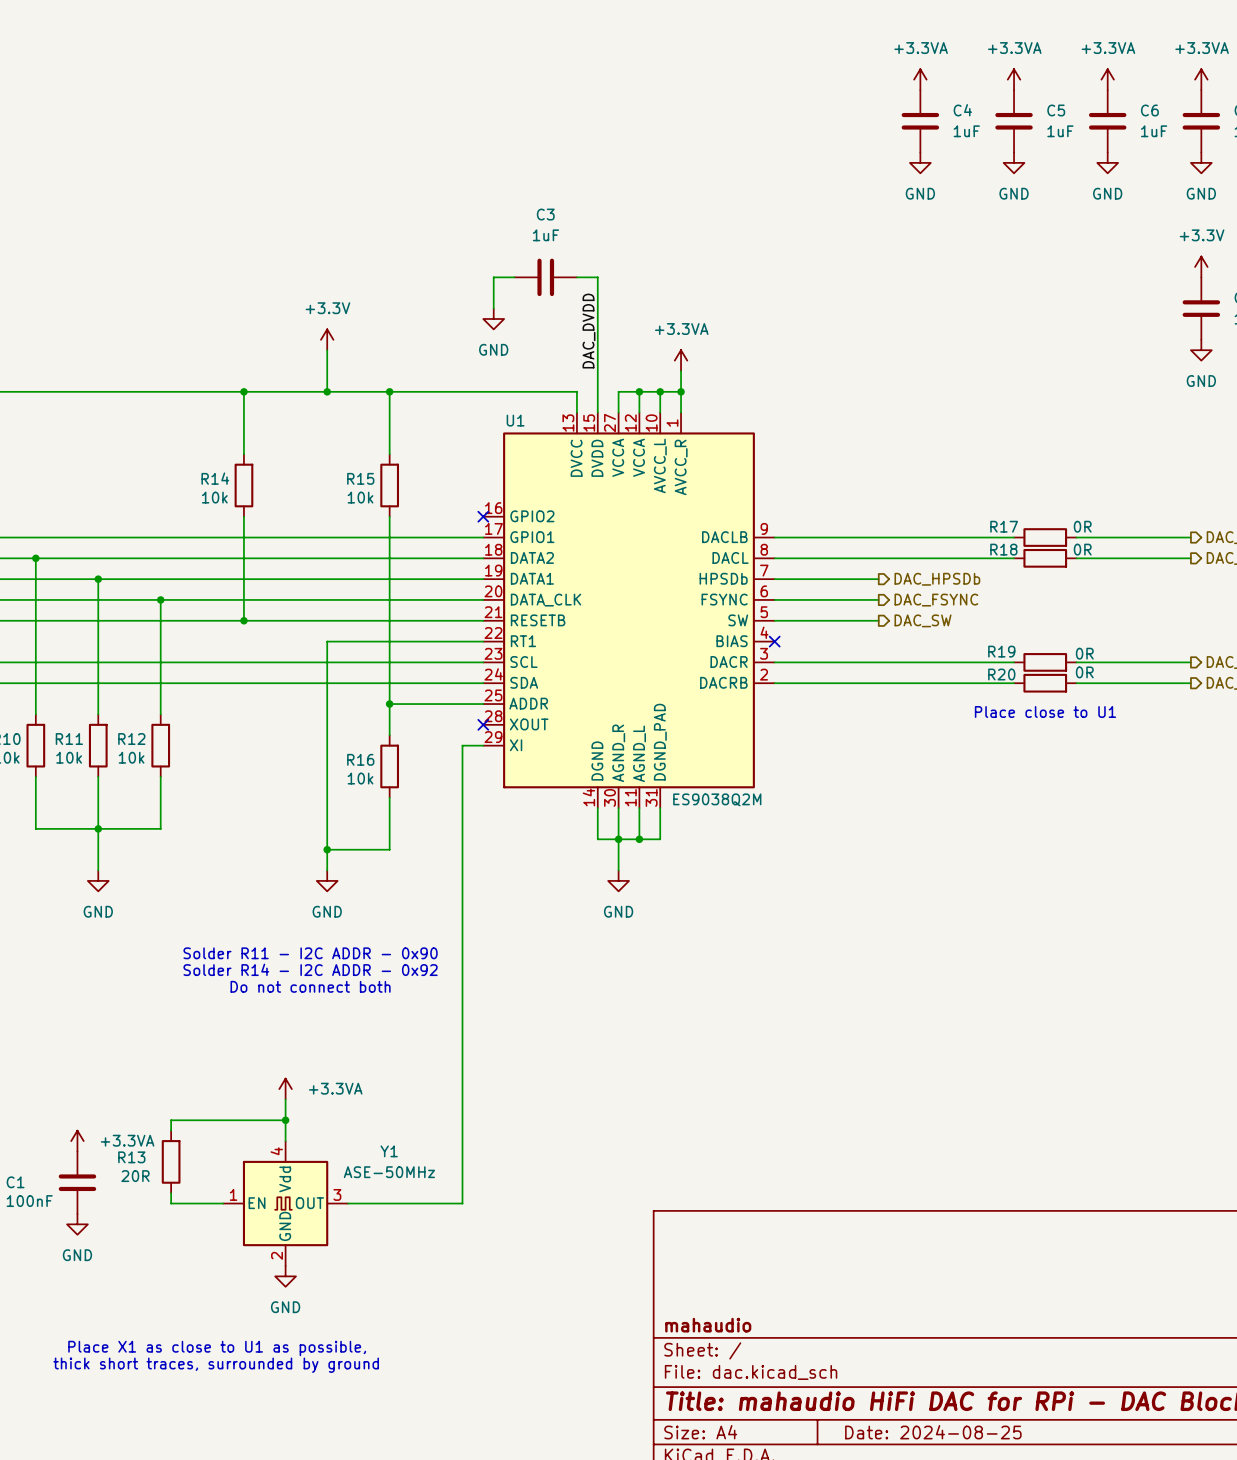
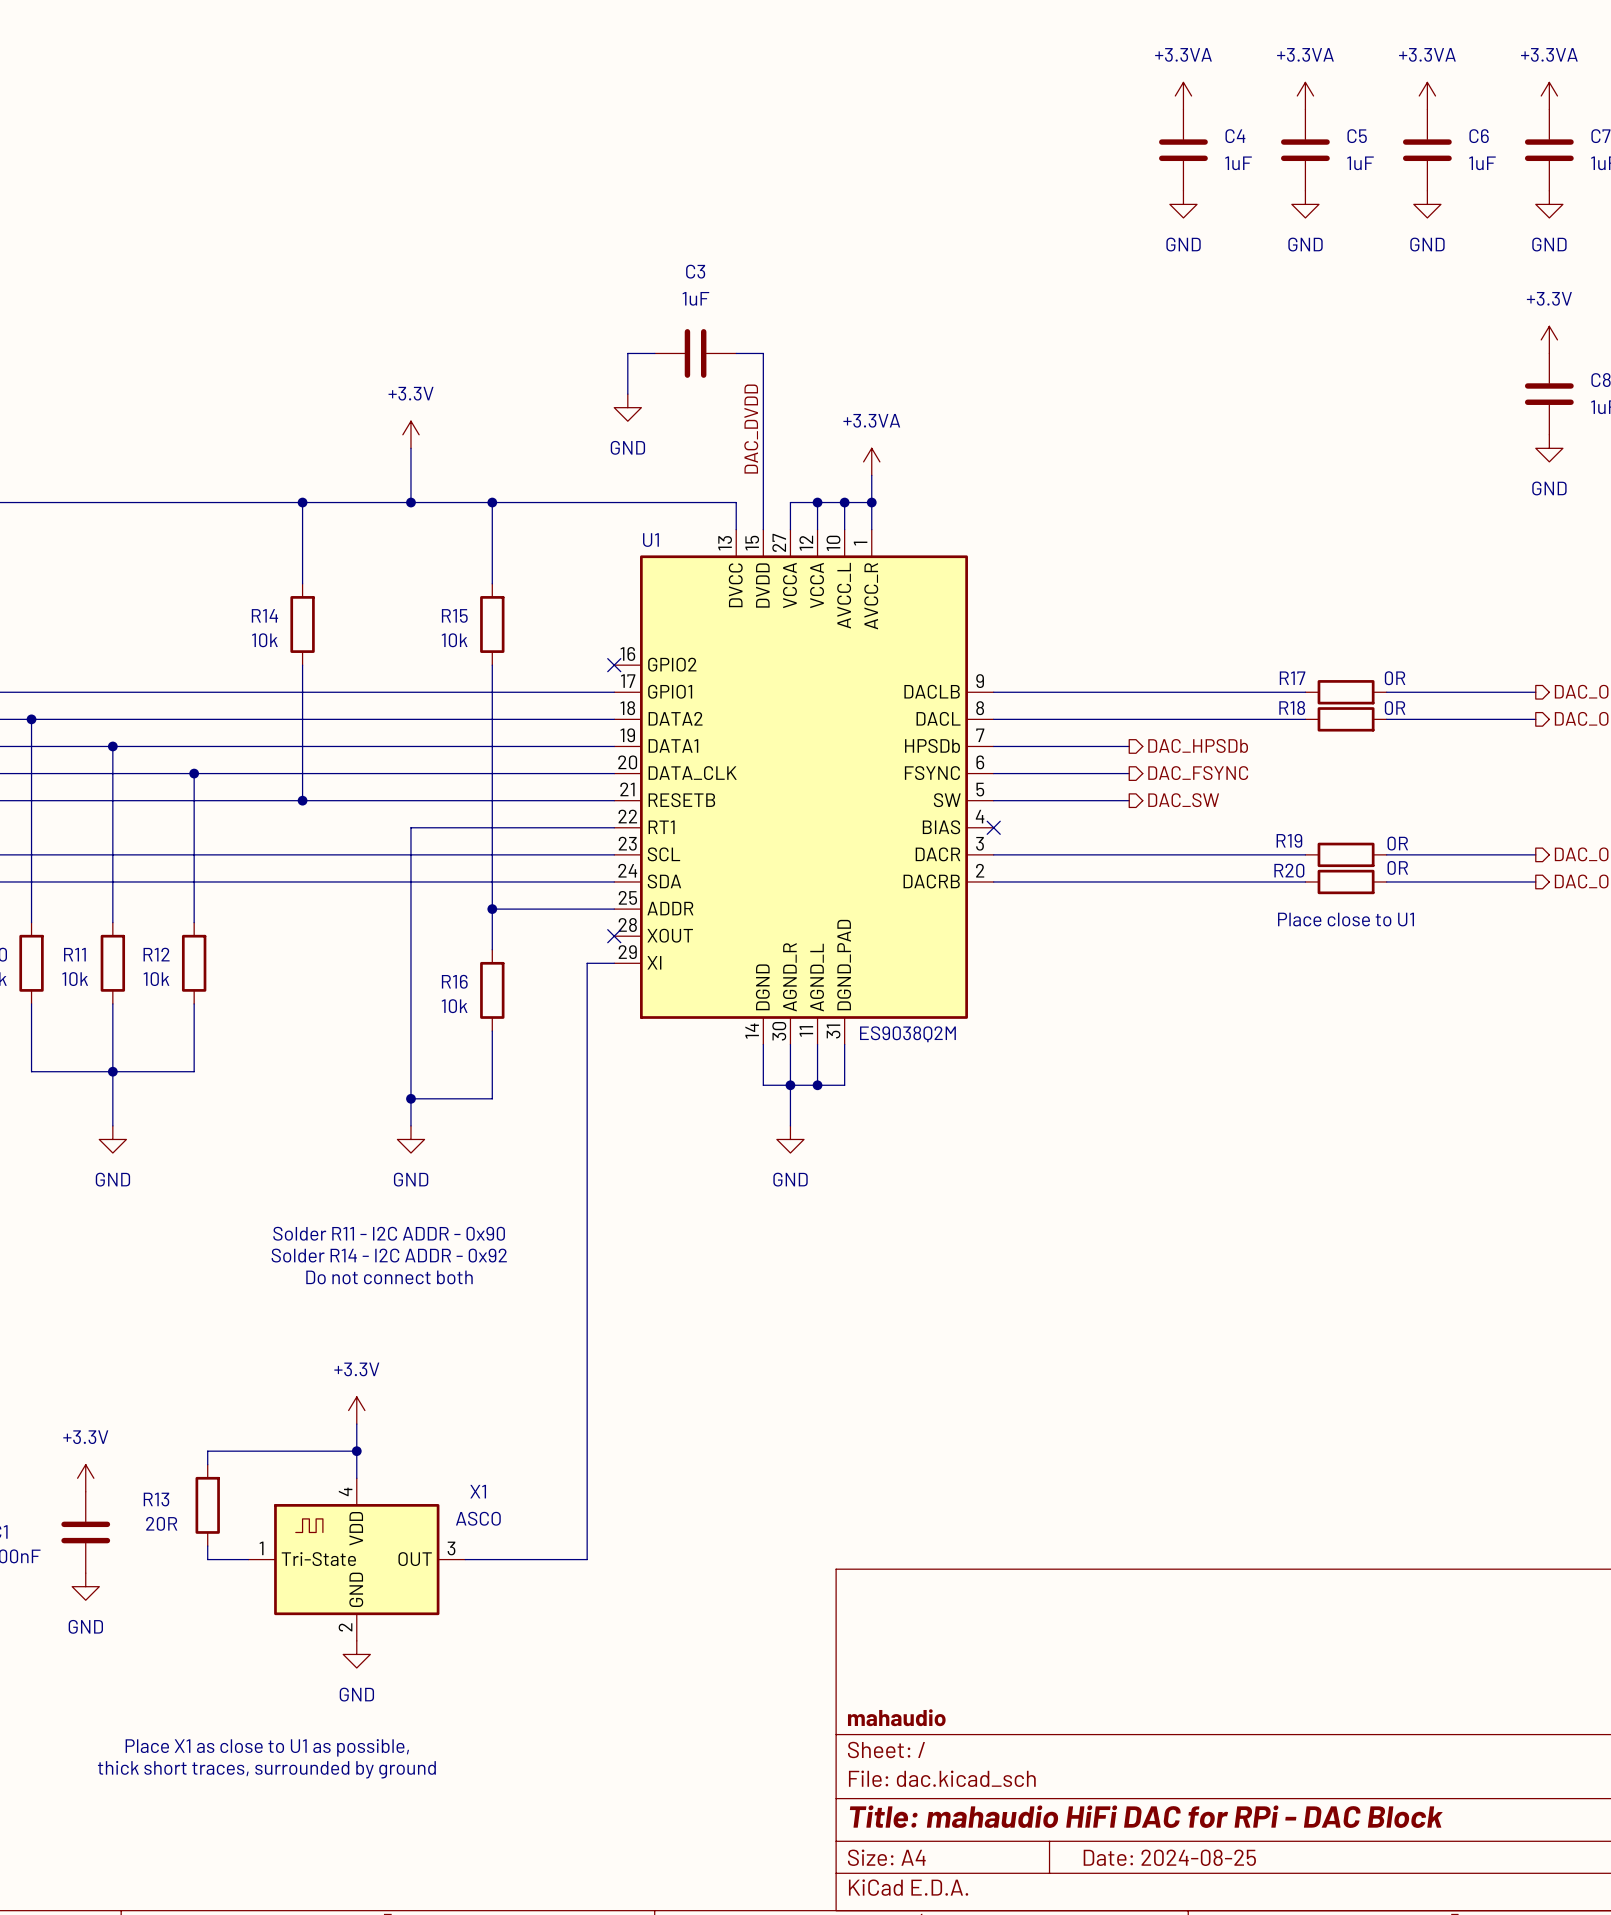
power symbol: +3.3VA (285, 1089) -> +3.3V (356, 1410)
power symbol: +3.3VA (77, 1141) -> +3.3V (85, 1478)
Y1: ASE-50MHz (285, 1203) -> none
X1: none -> ASCO (356, 1559)

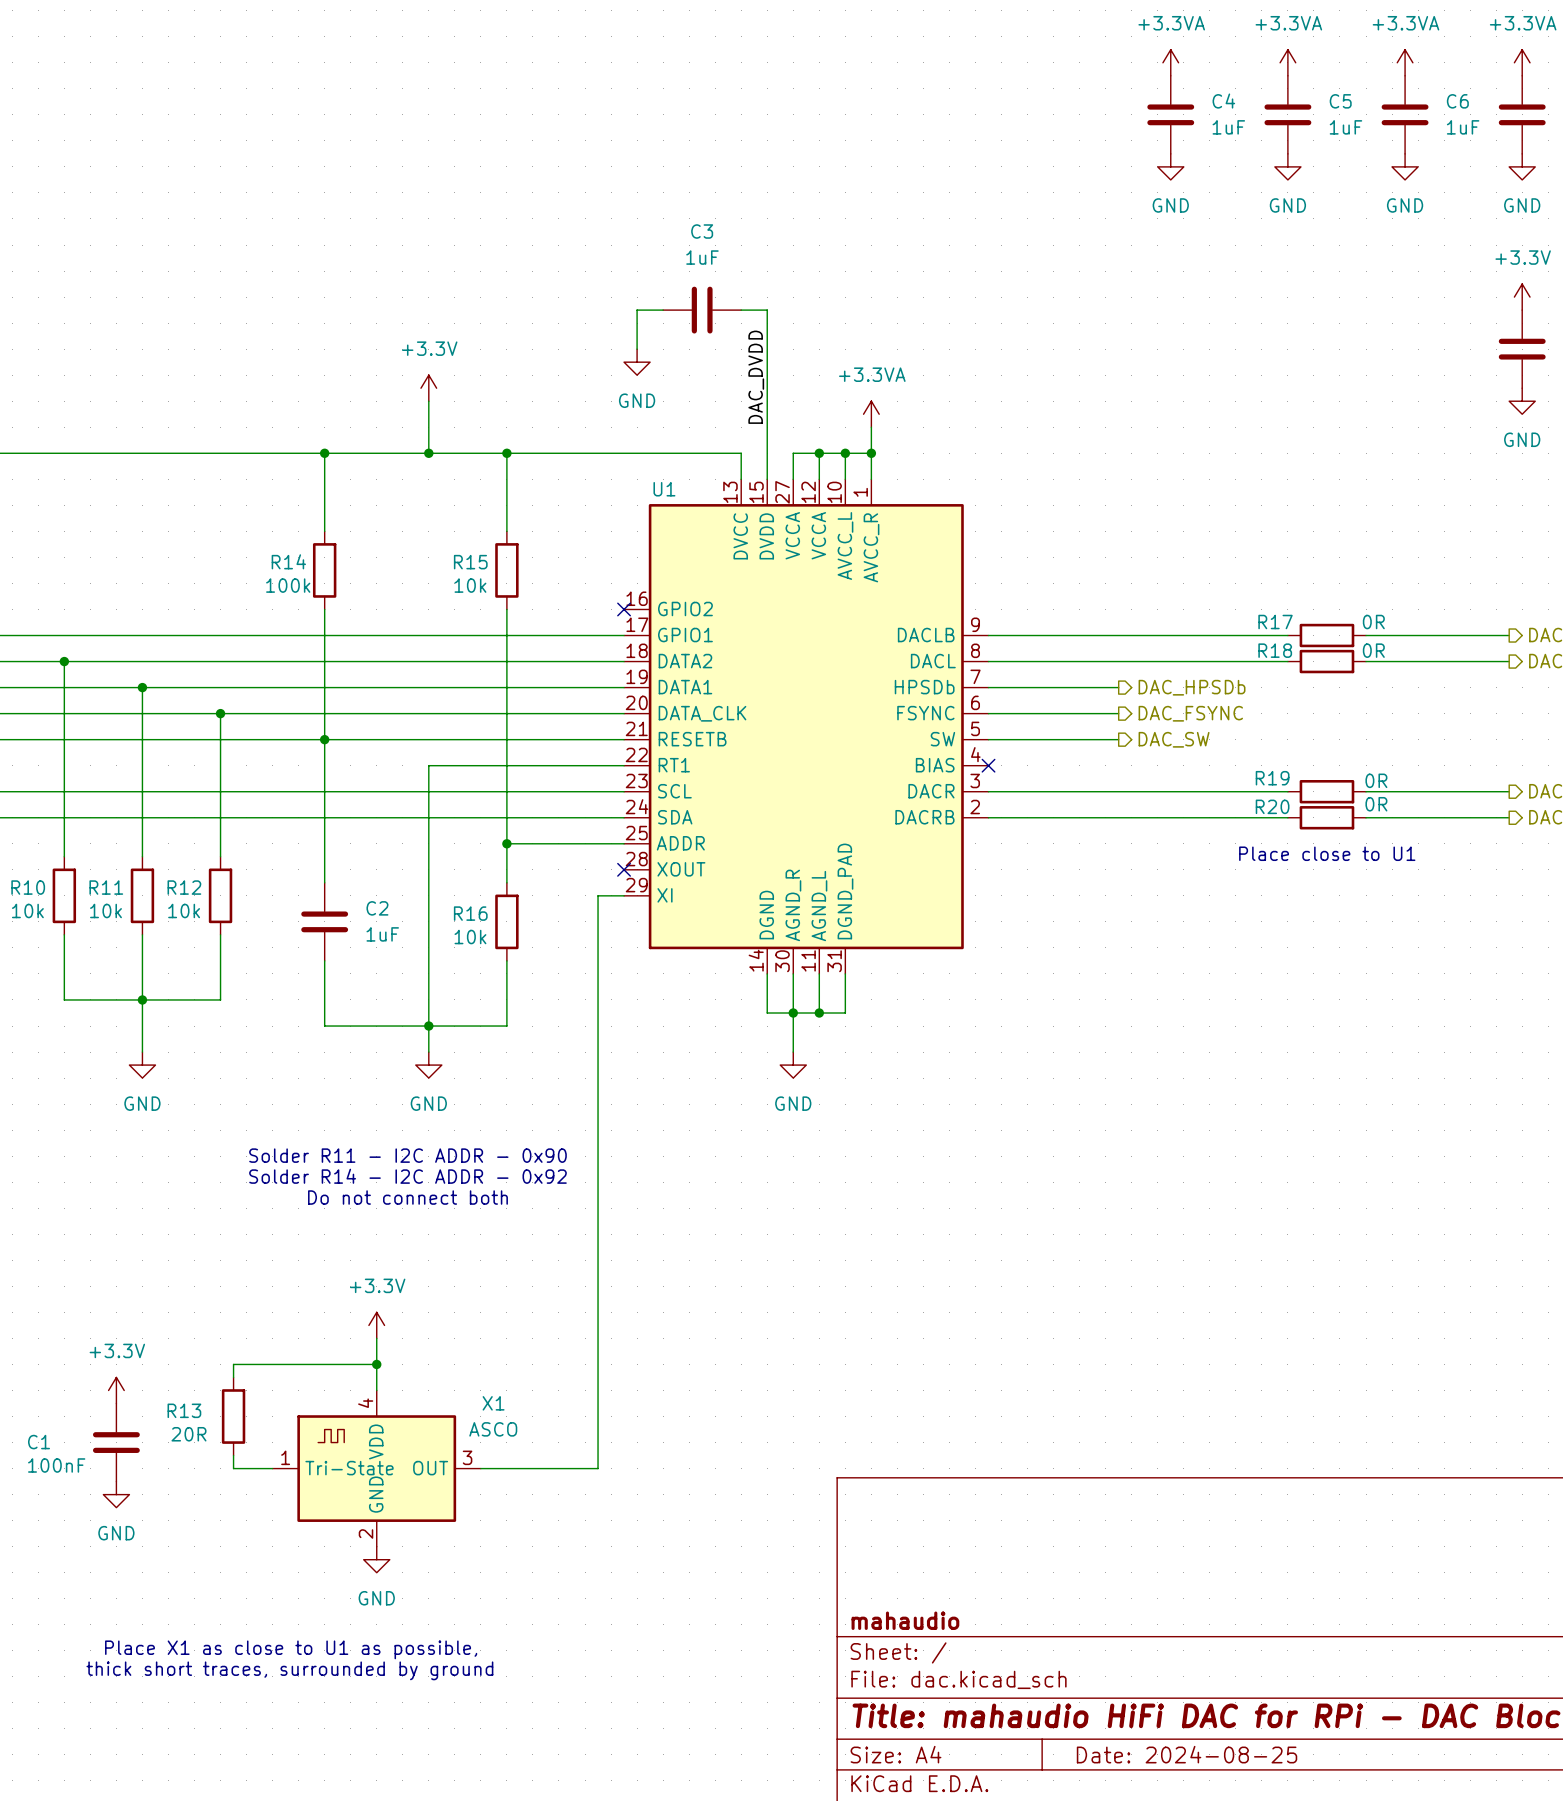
R14 value: 10k (264, 640) -> 100k (288, 585)
wire: none -> (324, 739) (324, 882)
C2: none -> 1uF (324, 921)
wire: none -> (324, 960) (324, 1026) (428, 1026)
U1 value: ES9038Q2M (907, 1034) -> none

